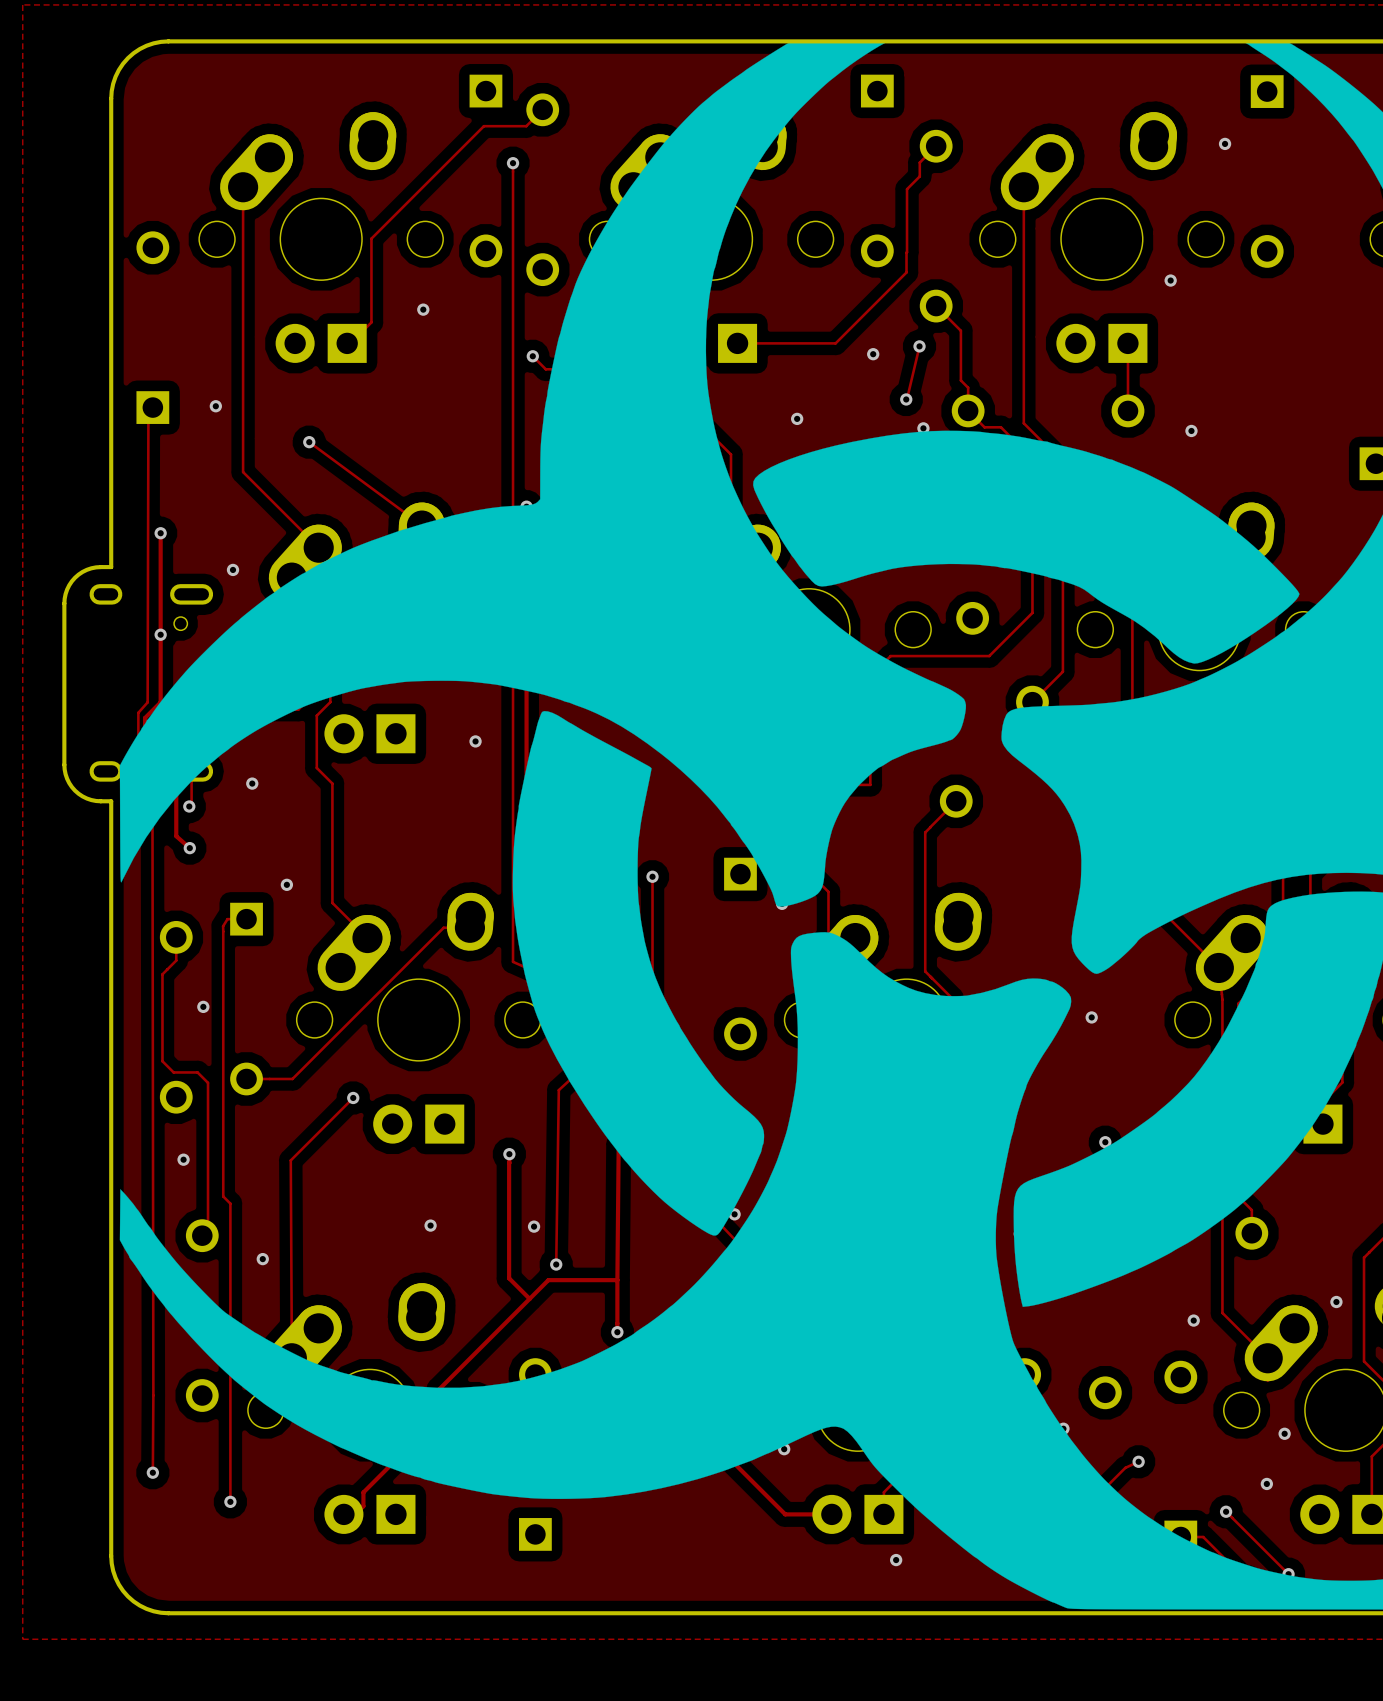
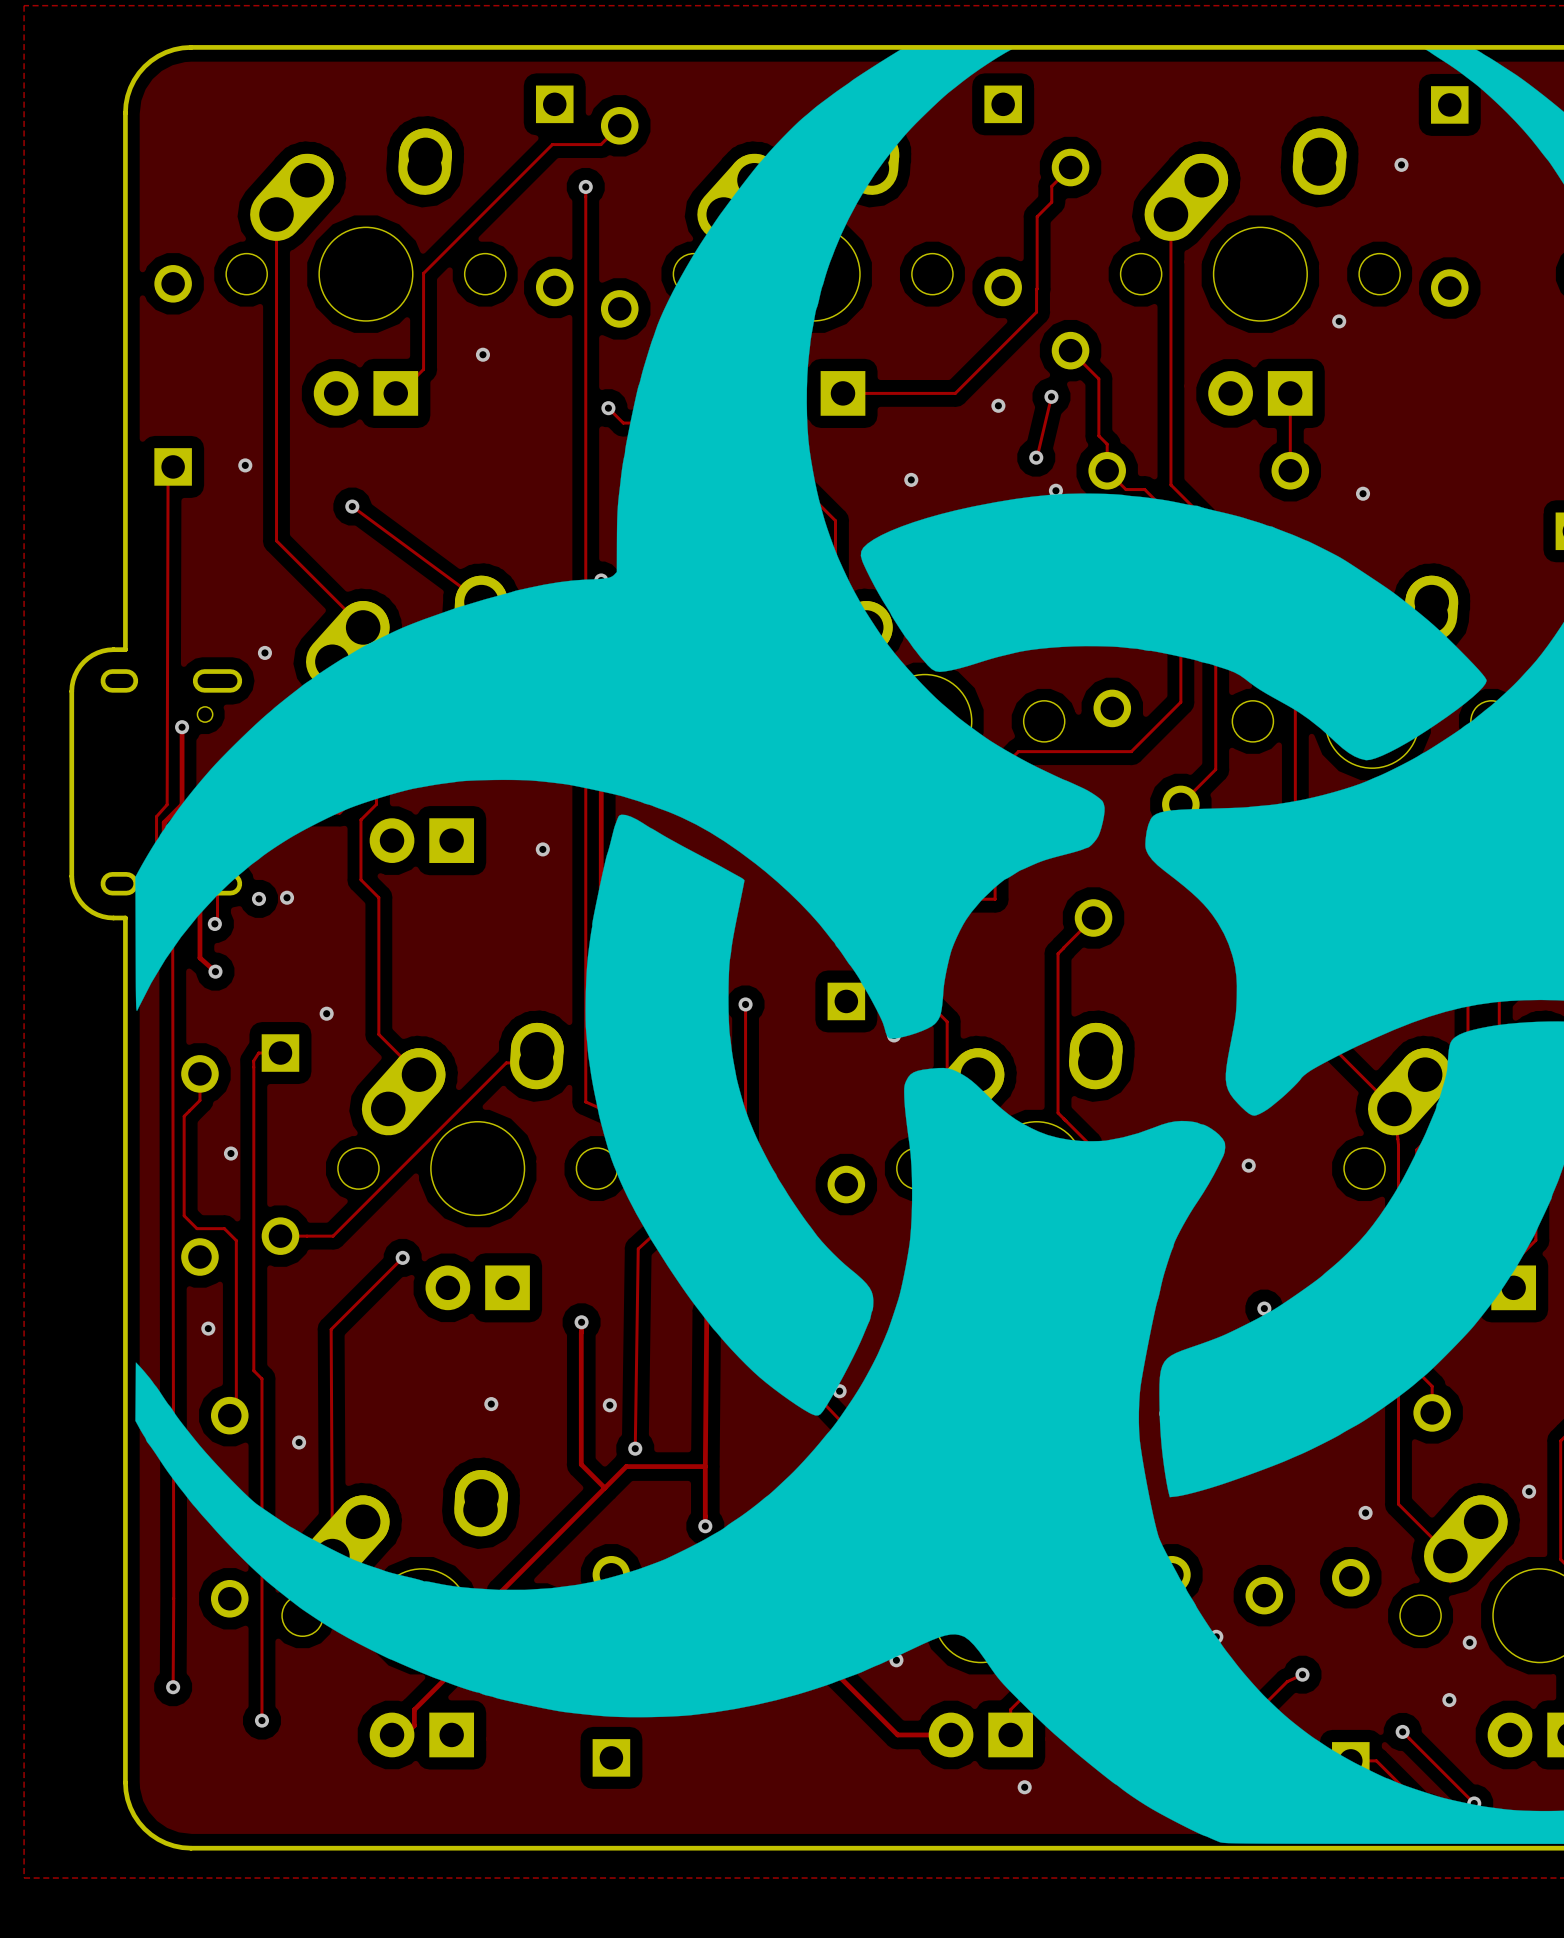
track: (160, 533) (160, 634) -> none
via: (160, 533) -> none
via: none -> (259, 898)

